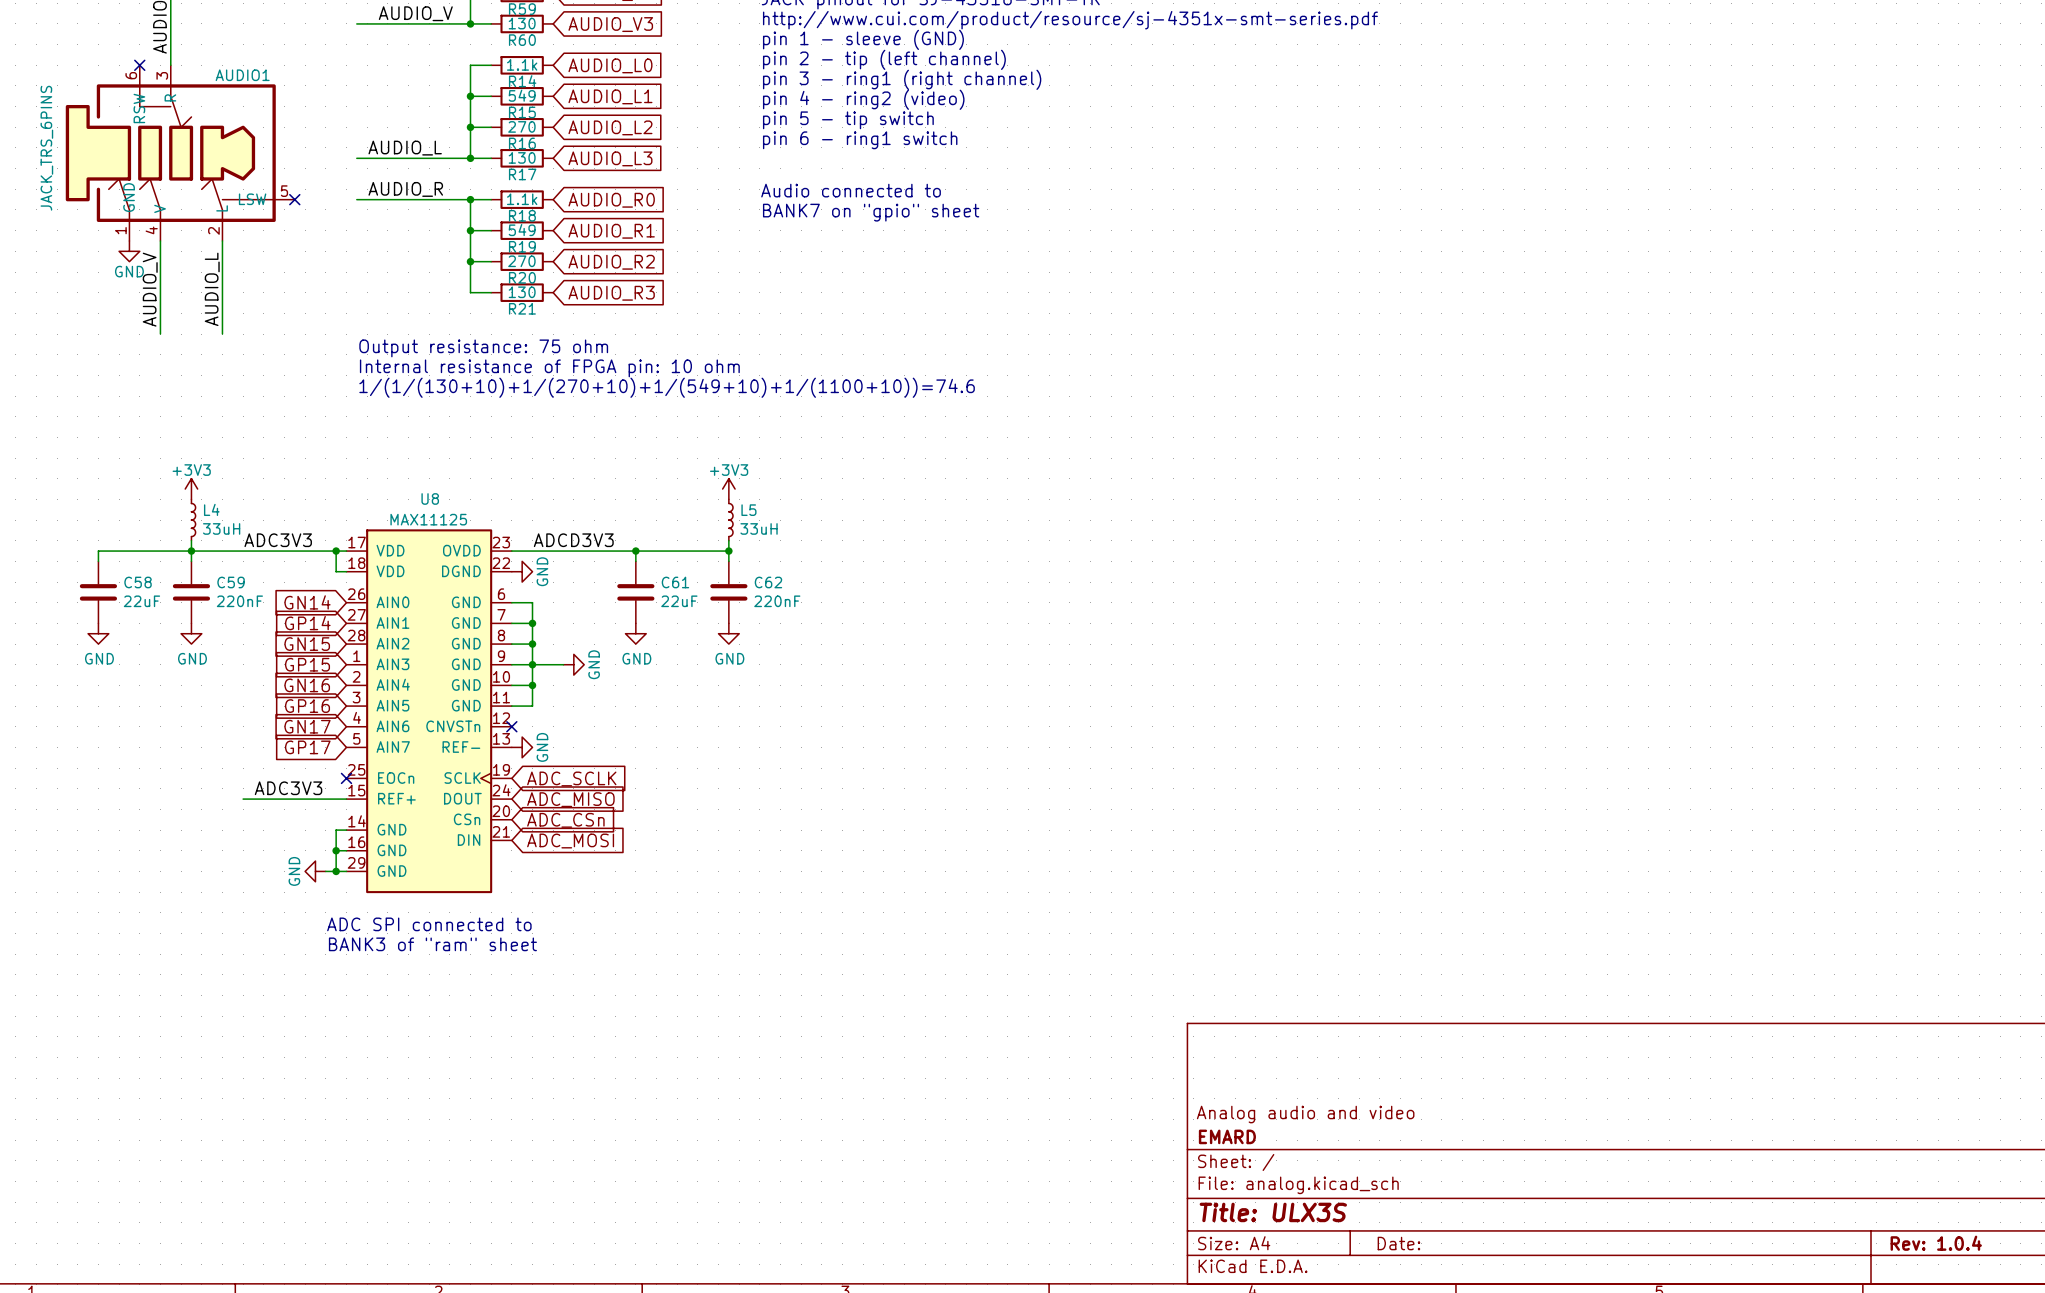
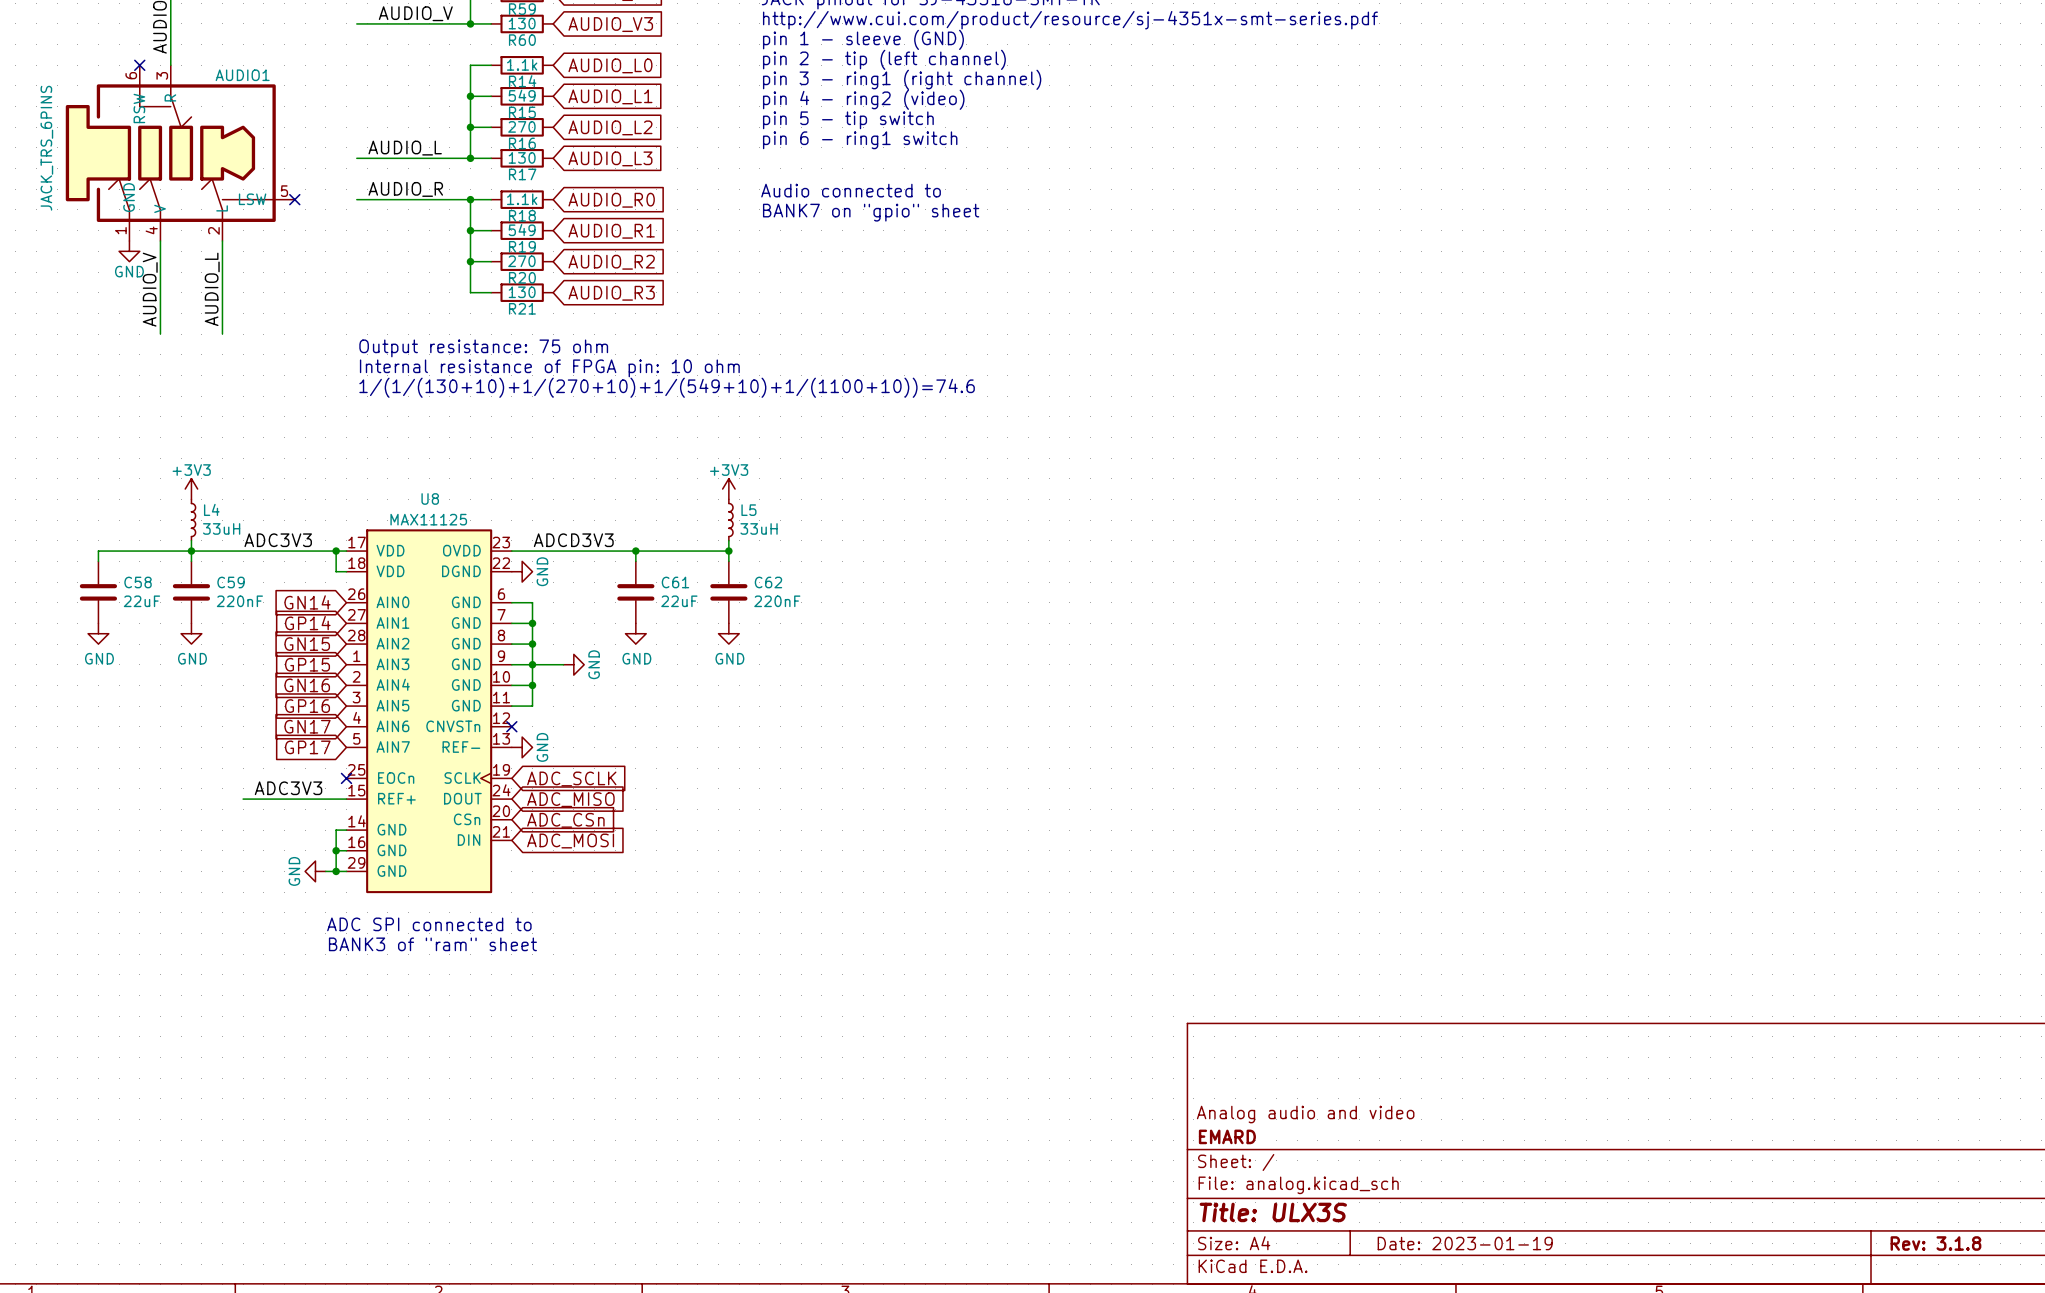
title block: Date: (1398, 1243) -> Date: 2023-01-19 (1465, 1243)
title block: Rev: 1.0.4 (1936, 1243) -> Rev: 3.1.8 (1935, 1243)

